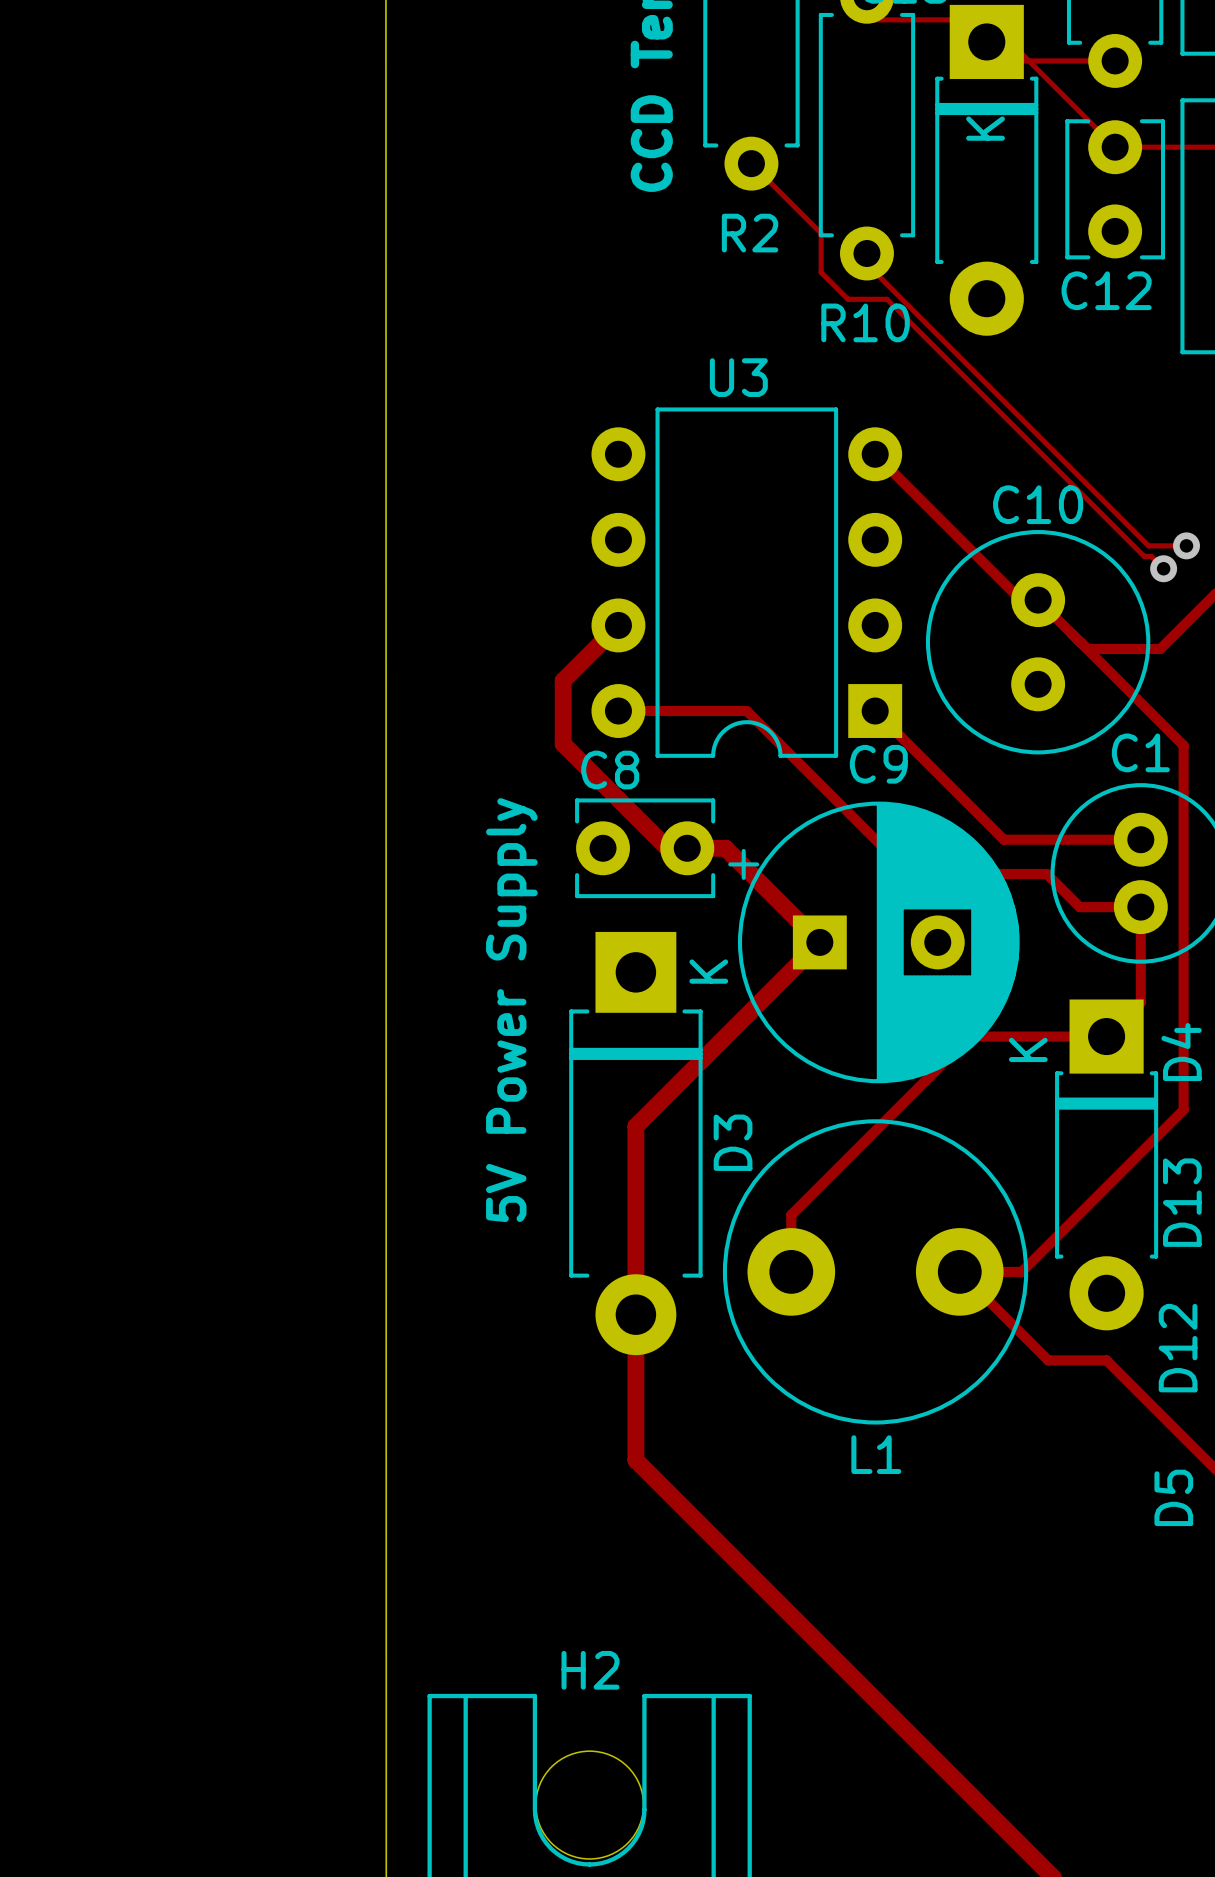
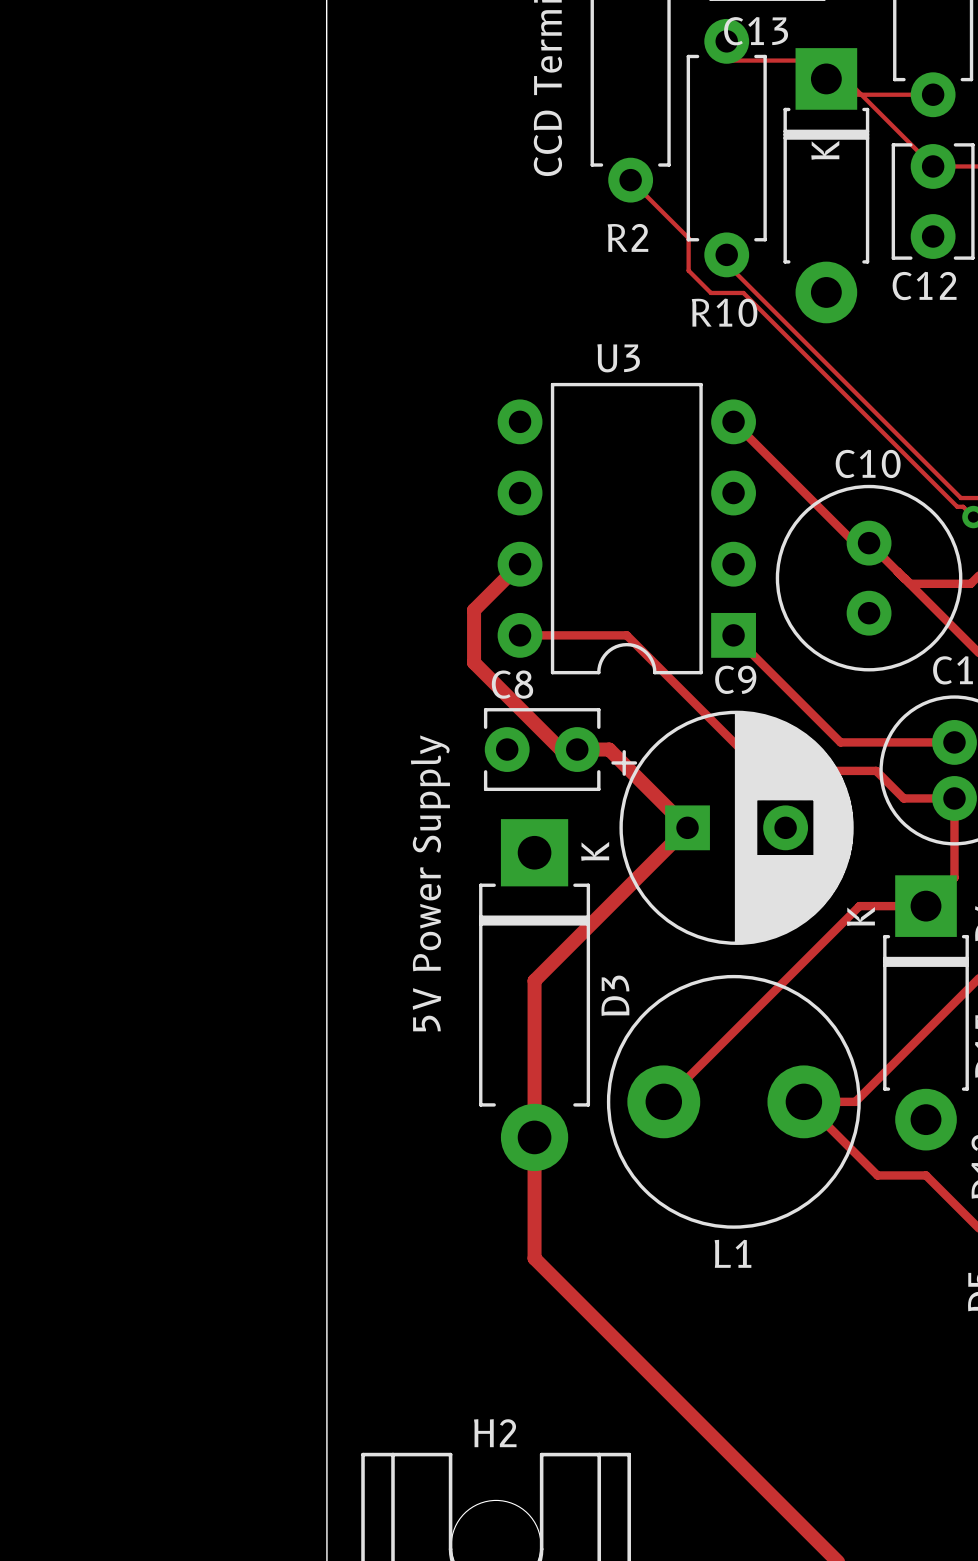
track: (1026, 1036) (969, 1036) (791, 1214) (791, 1271) -> (859, 906) (663, 1101)

